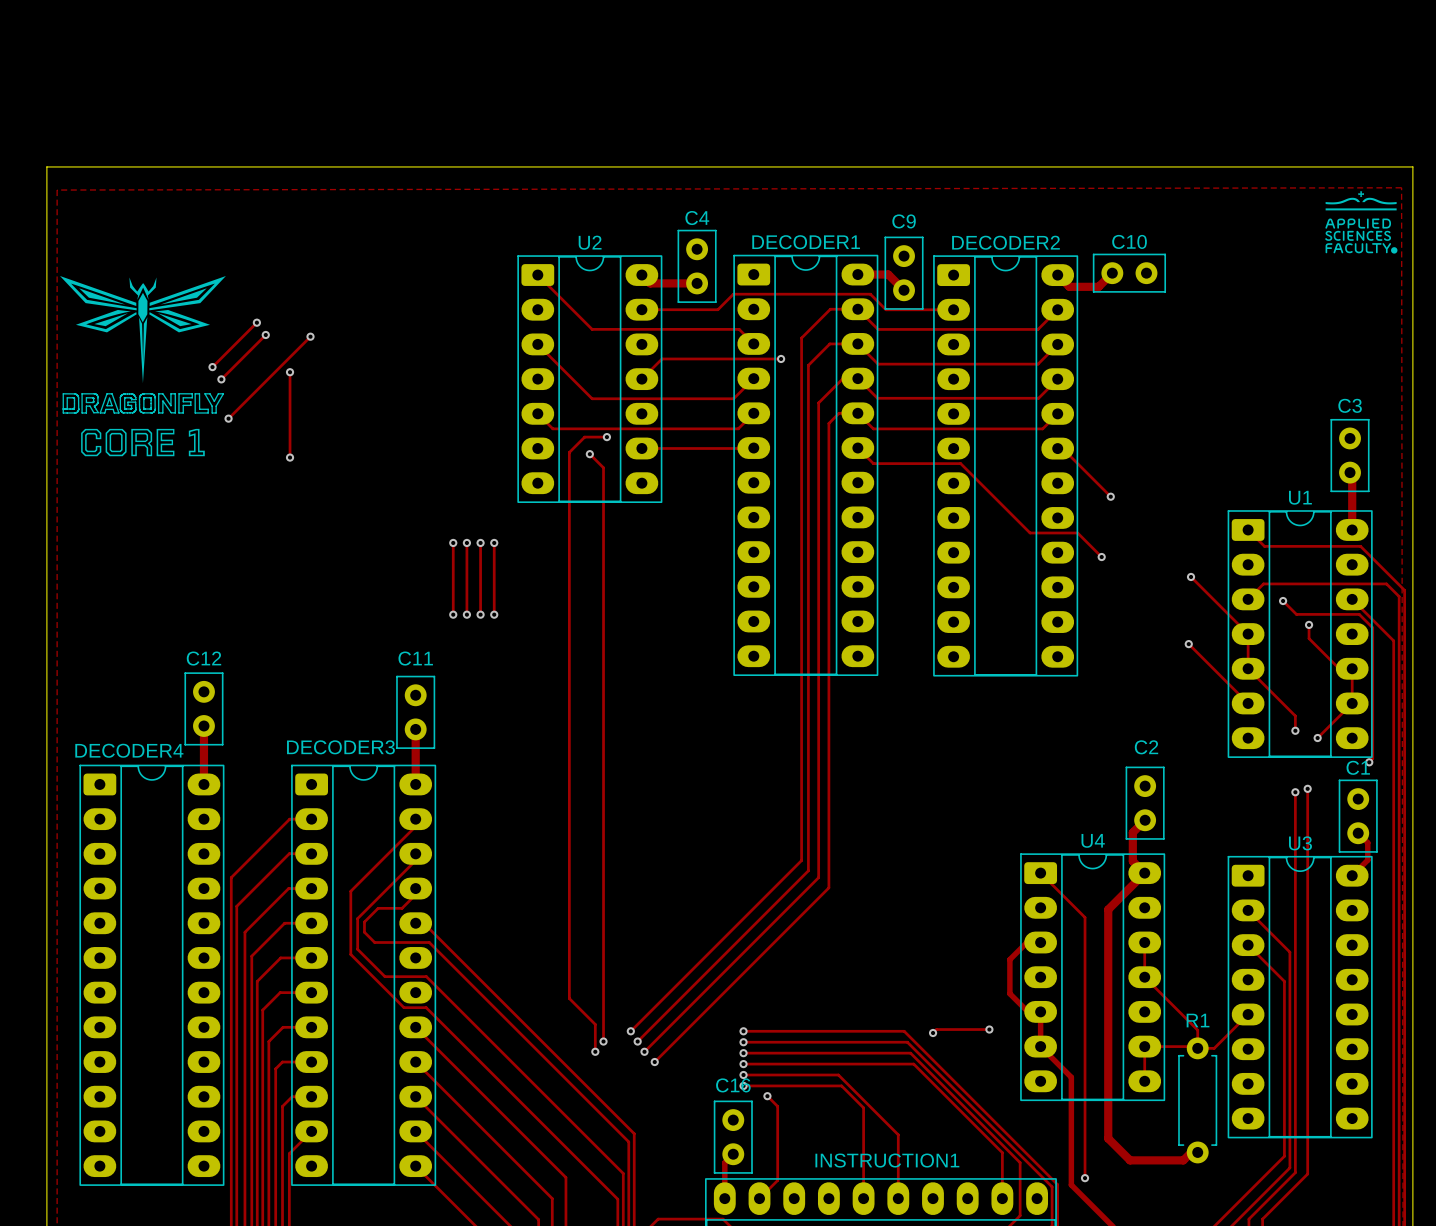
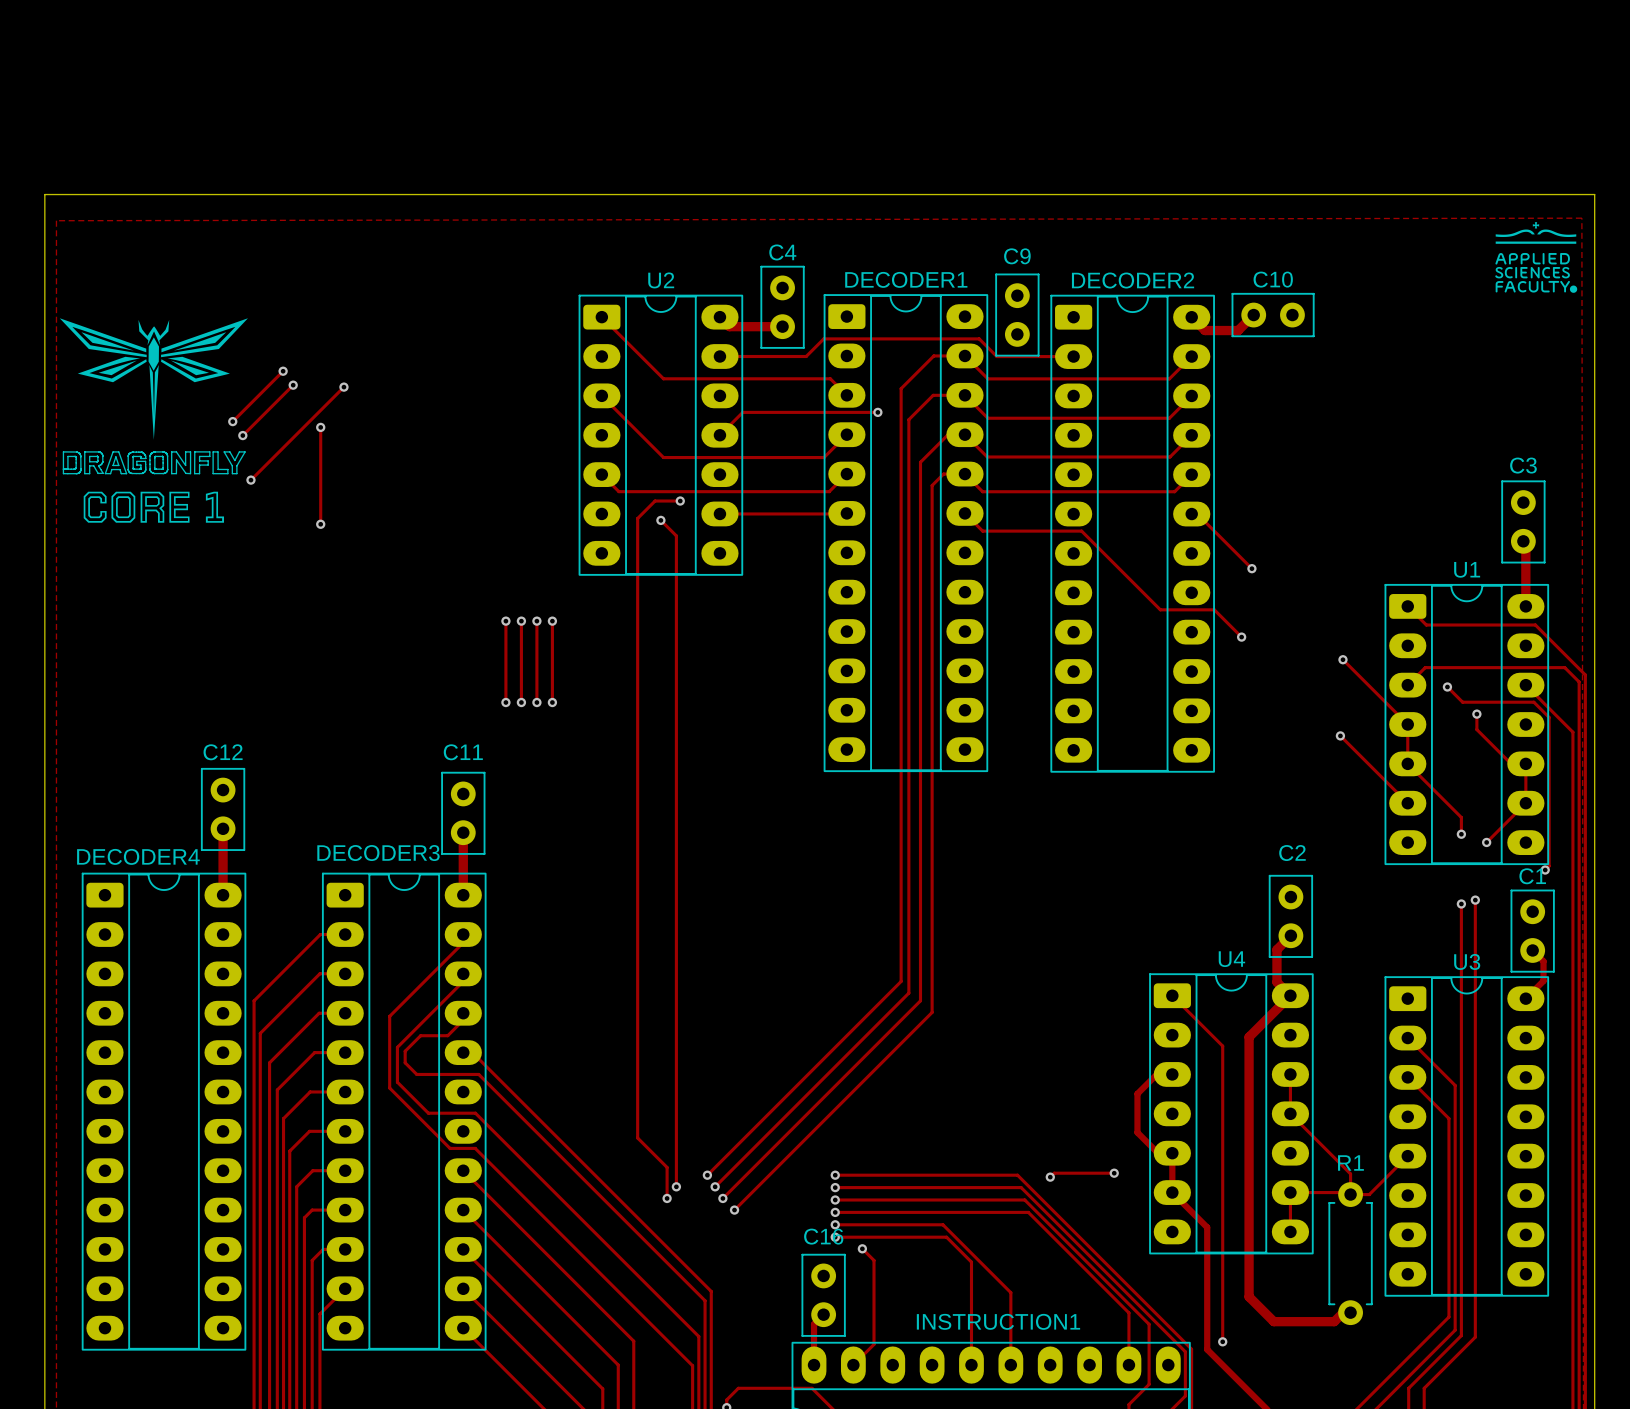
track: (857, 274) (888, 274) (904, 290) -> none

